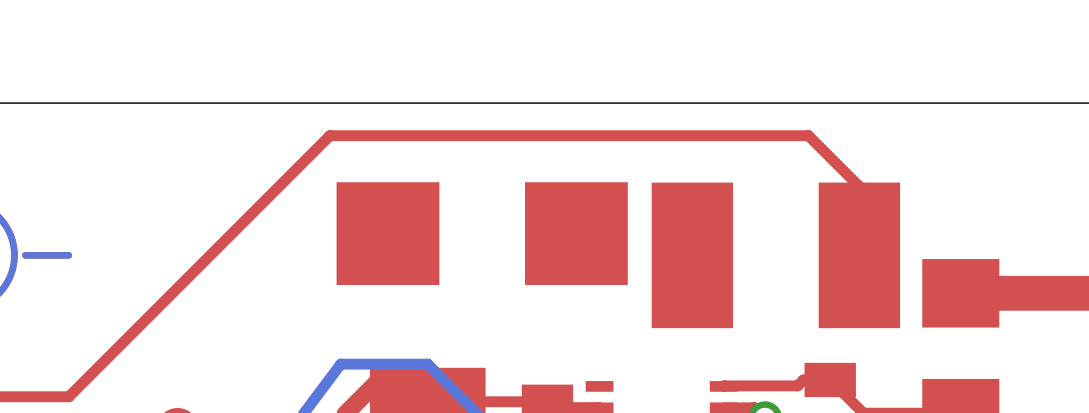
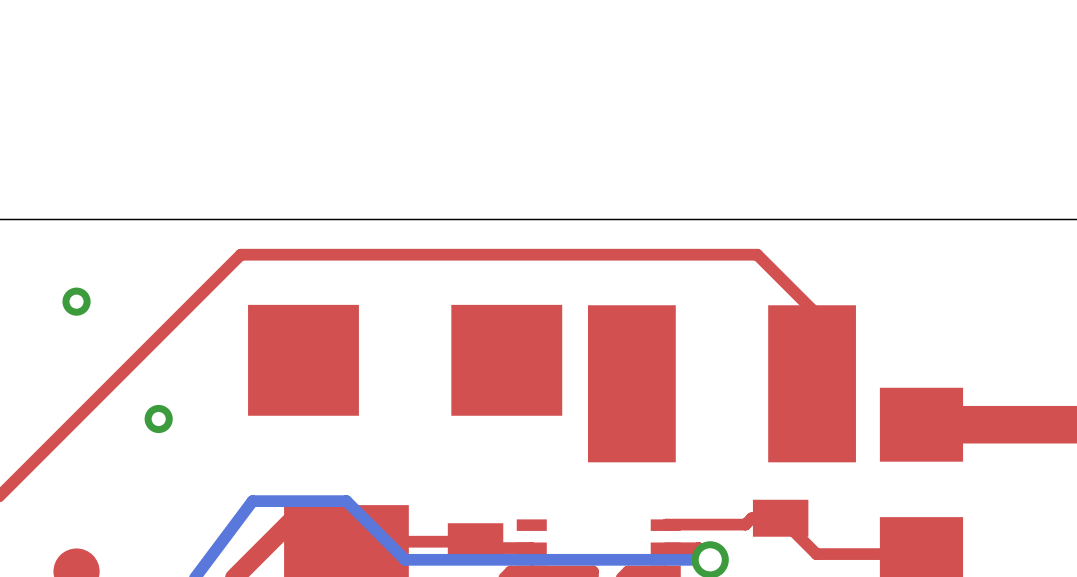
via: none -> (76, 301)
via: none -> (158, 419)

